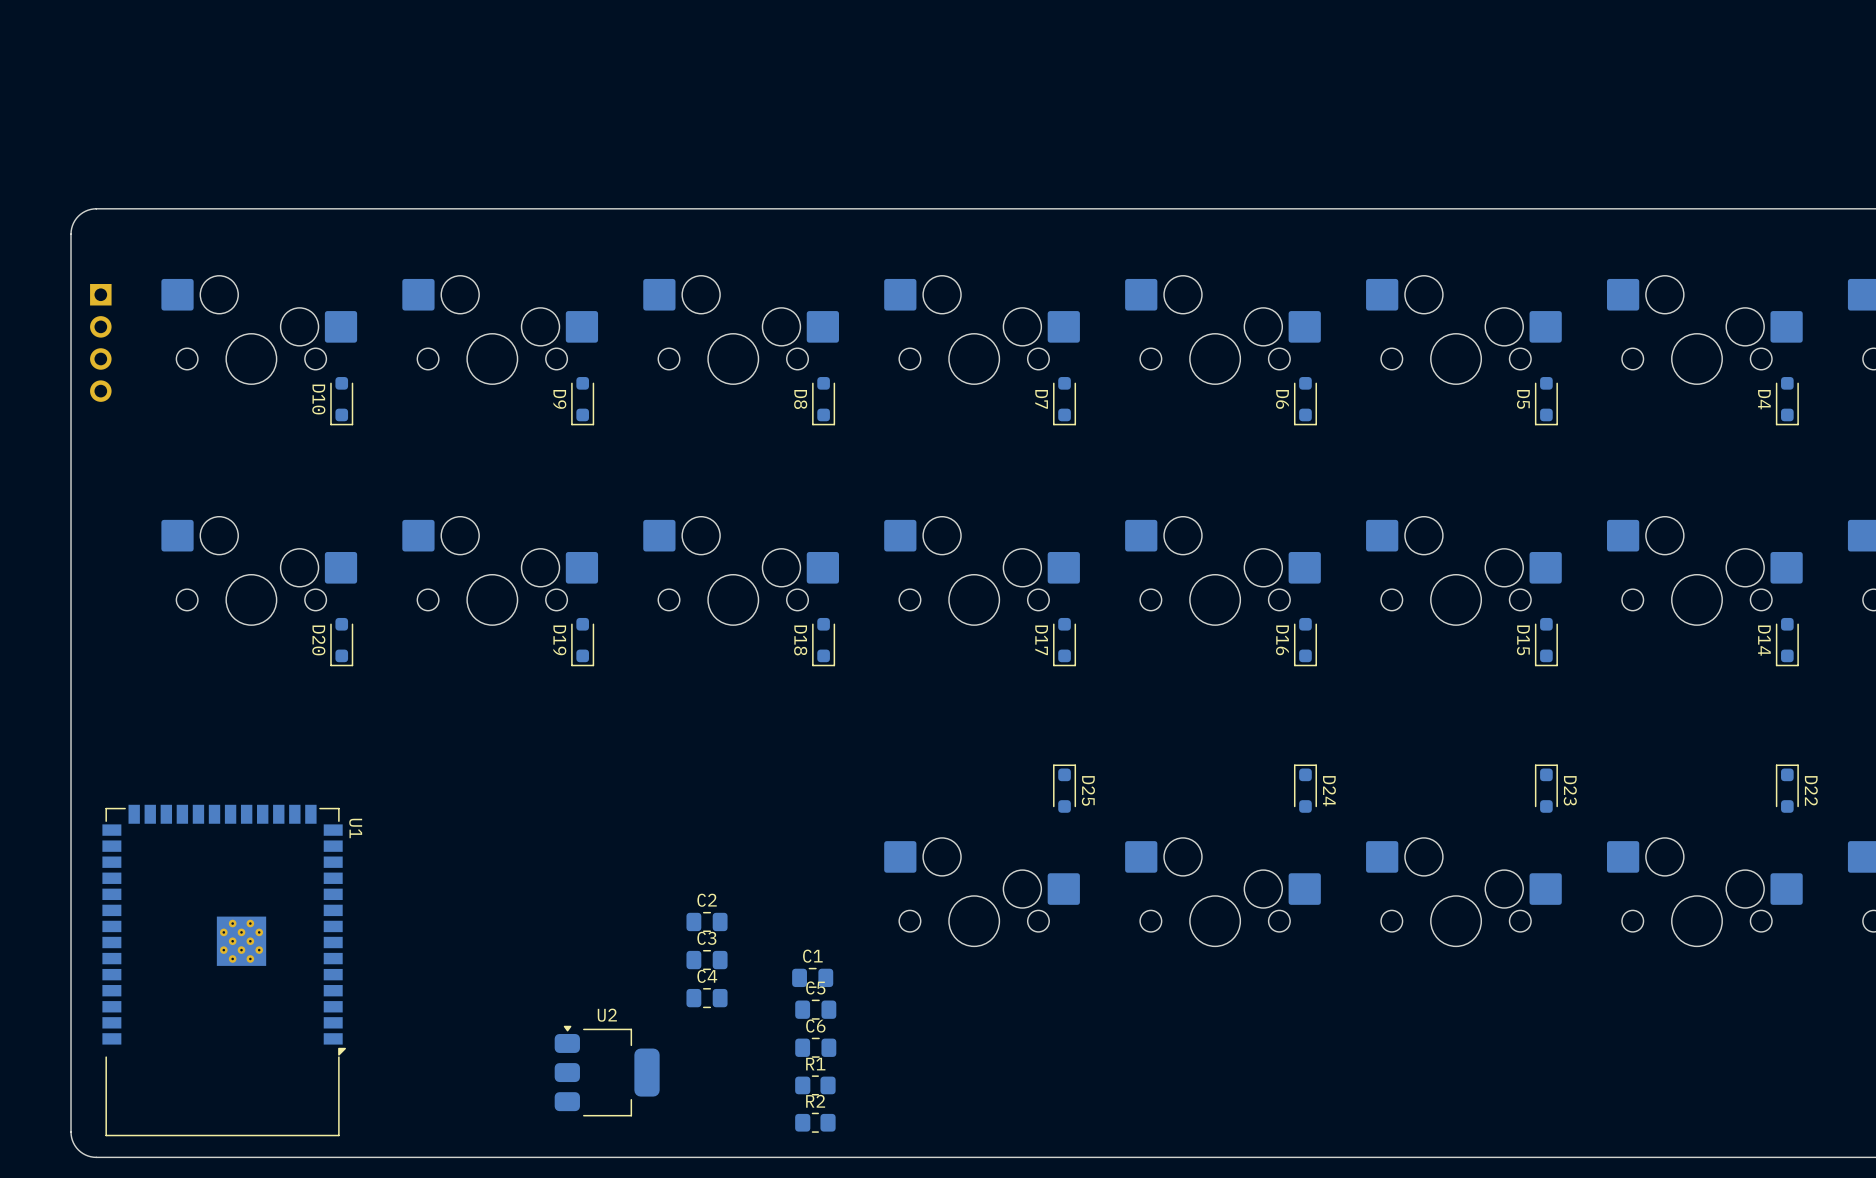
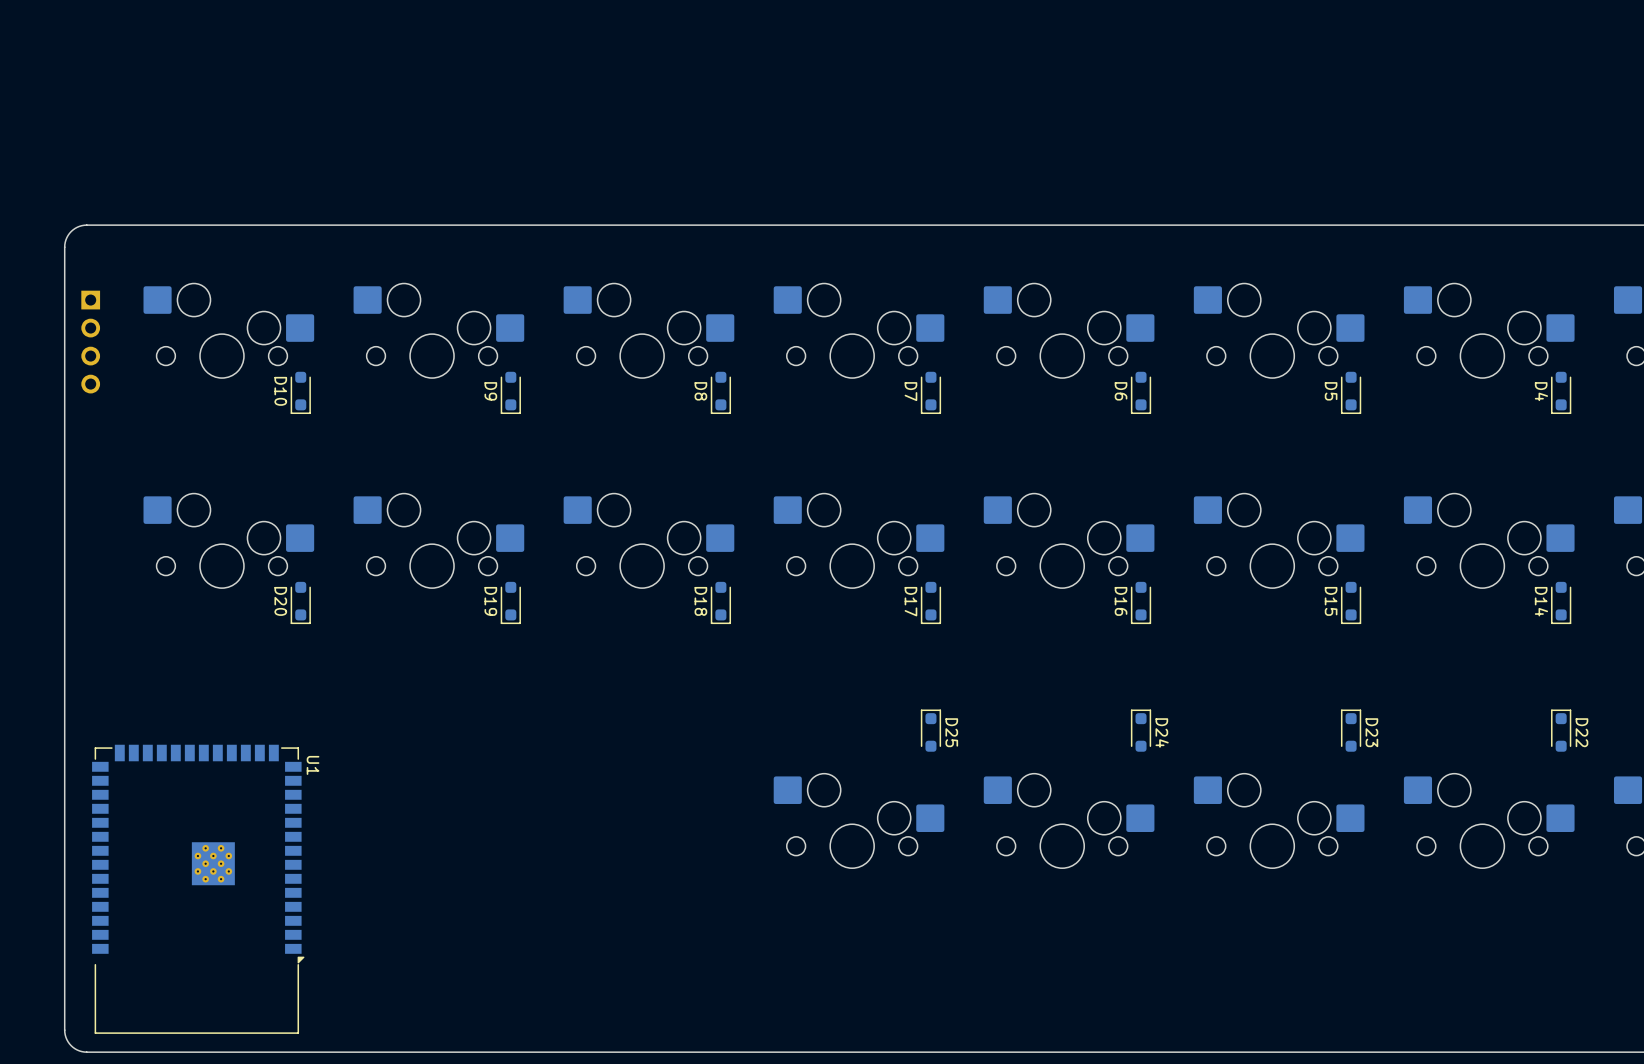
C2: (707, 921) -> none
C3: (707, 960) -> none
C1: (812, 977) -> none
C4: (707, 998) -> none
C5: (815, 1009) -> none
C6: (815, 1047) -> none
U2: (607, 1071) -> none
R1: (815, 1085) -> none
R2: (815, 1122) -> none

